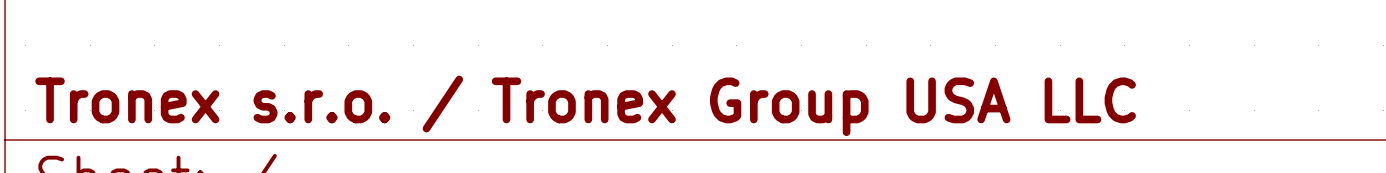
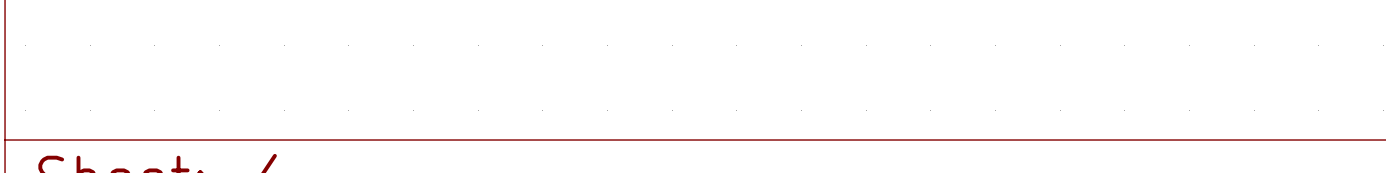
title block: Tronex s.r.o. / Tronex Group USA LLC (585, 105) -> none

